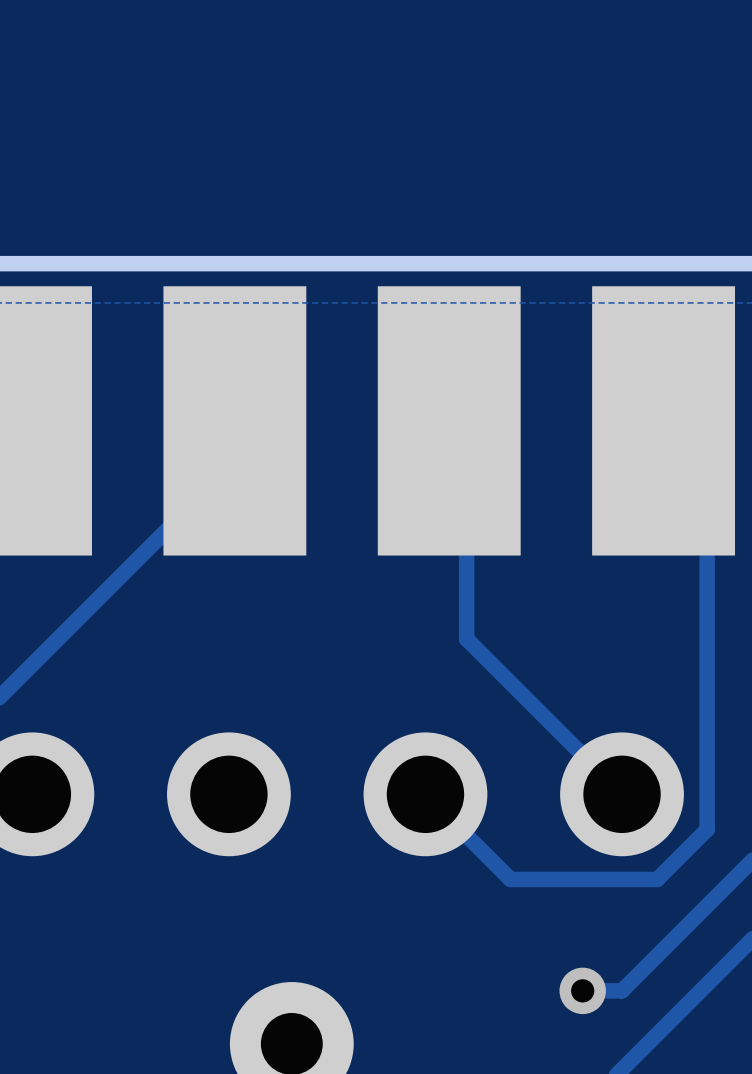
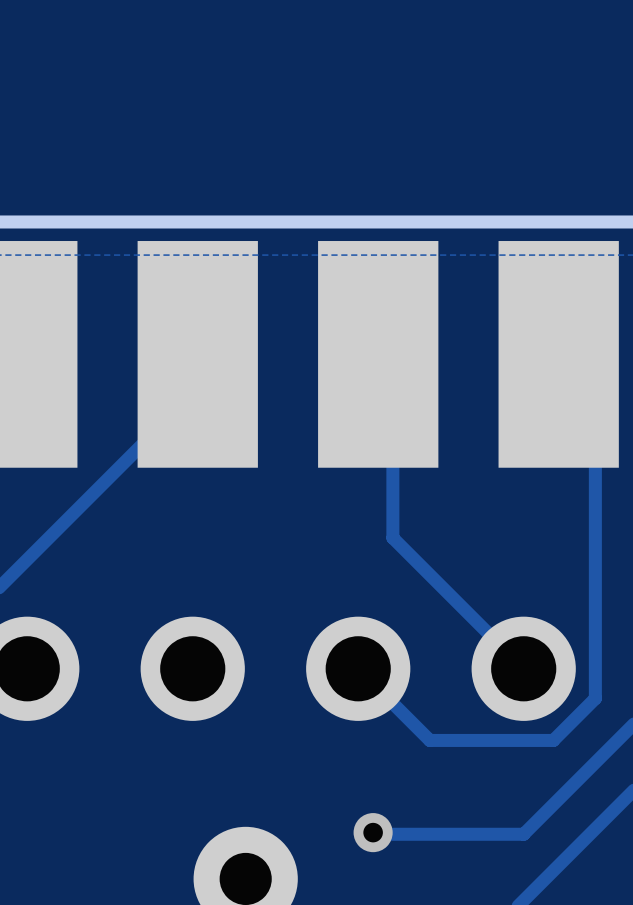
track: none -> (373, 832) (374, 834) (490, 834)
via position: (582, 990) -> (373, 832)

